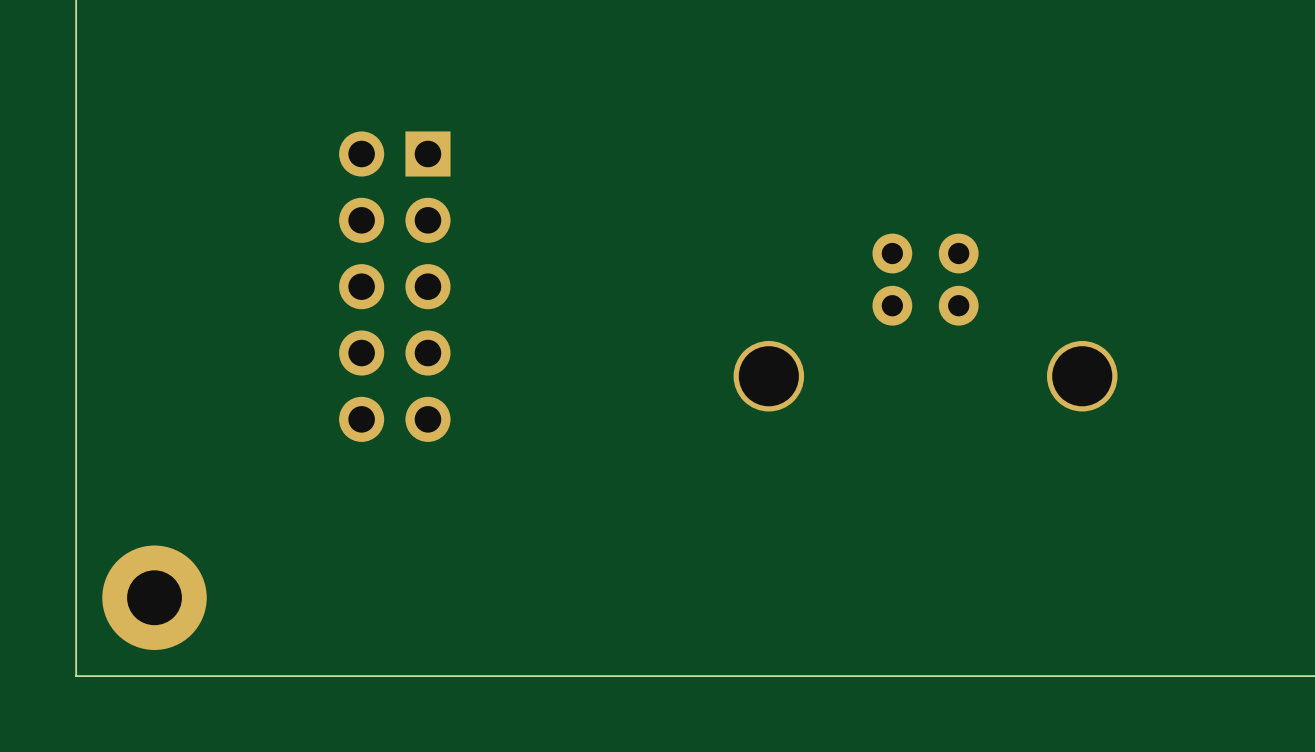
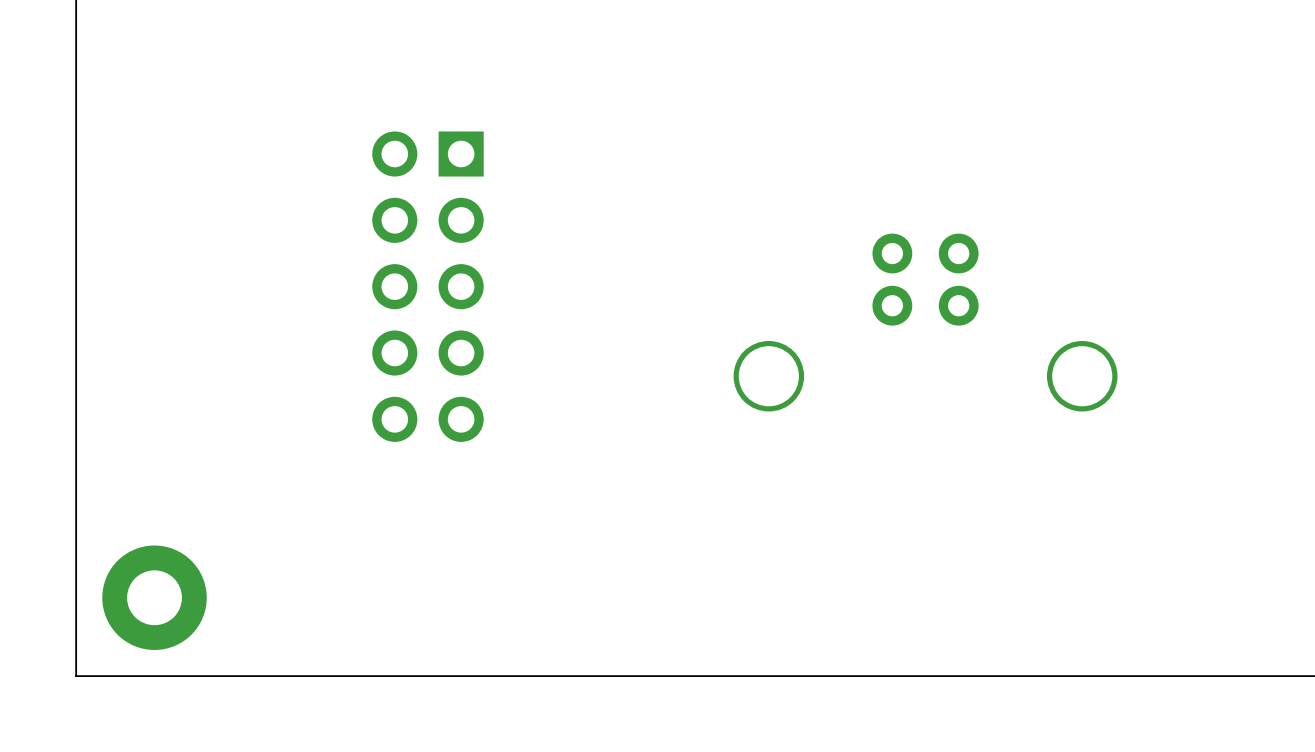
part position: (394, 286) -> (427, 286)

